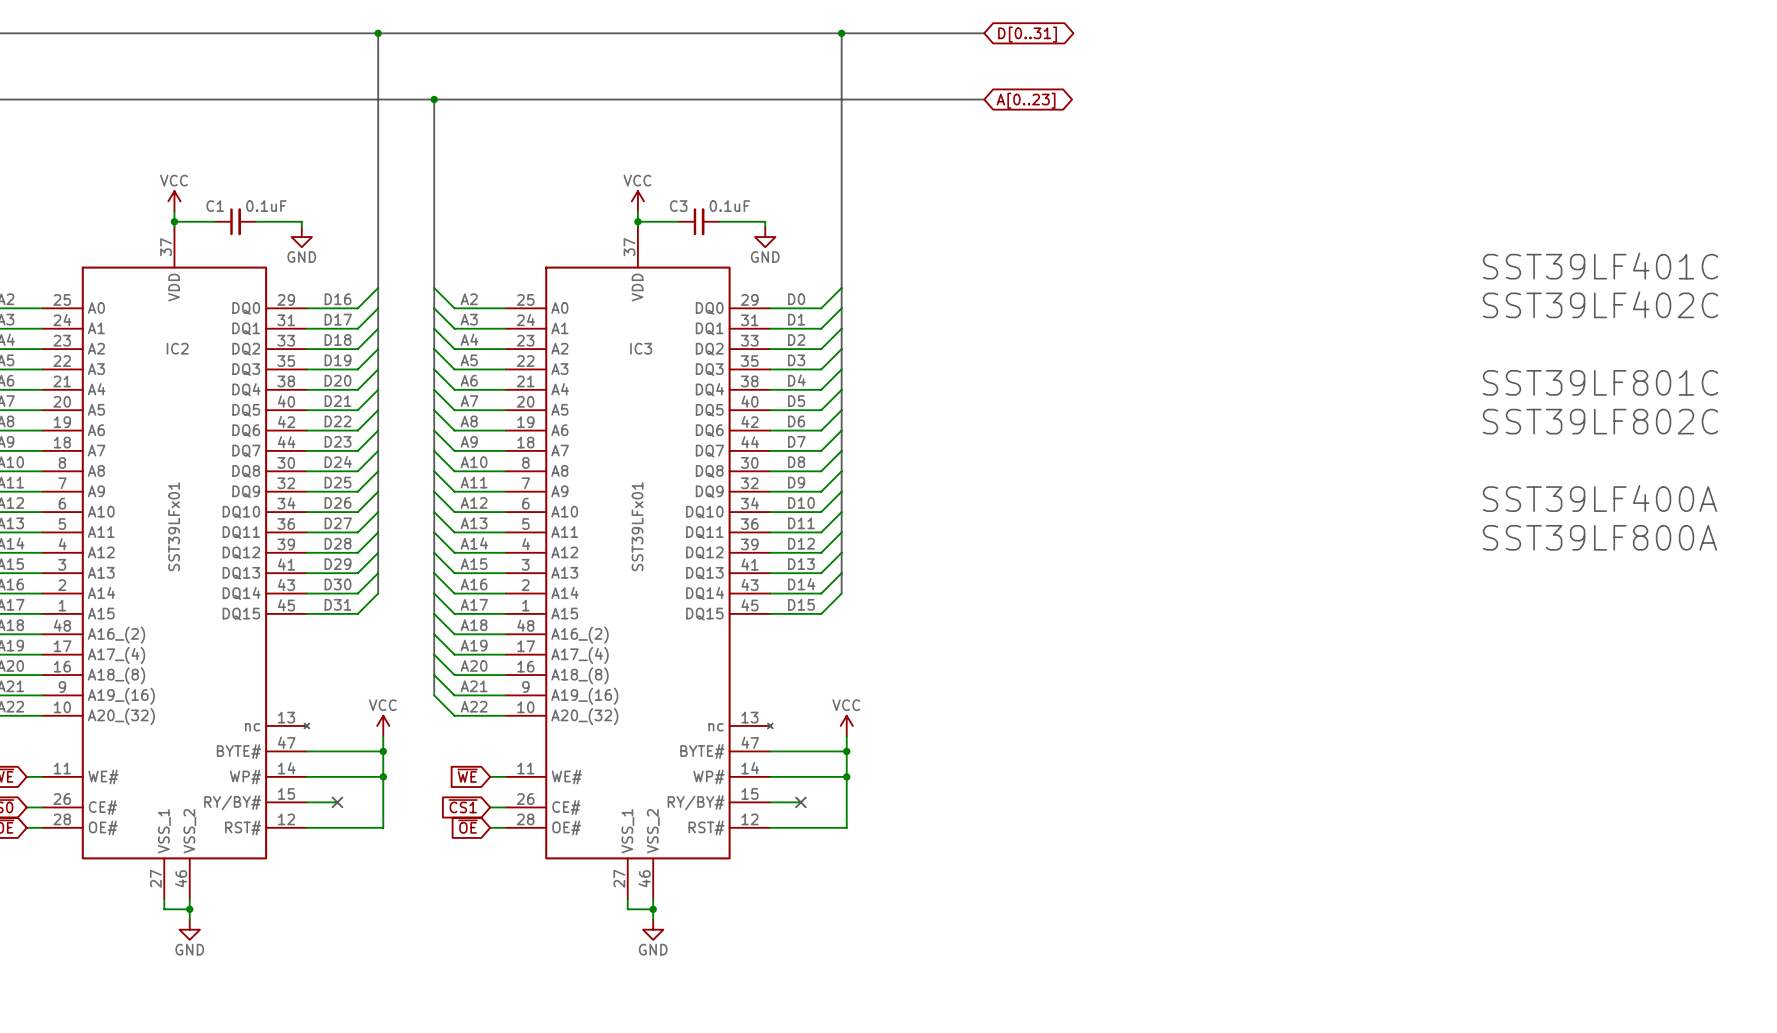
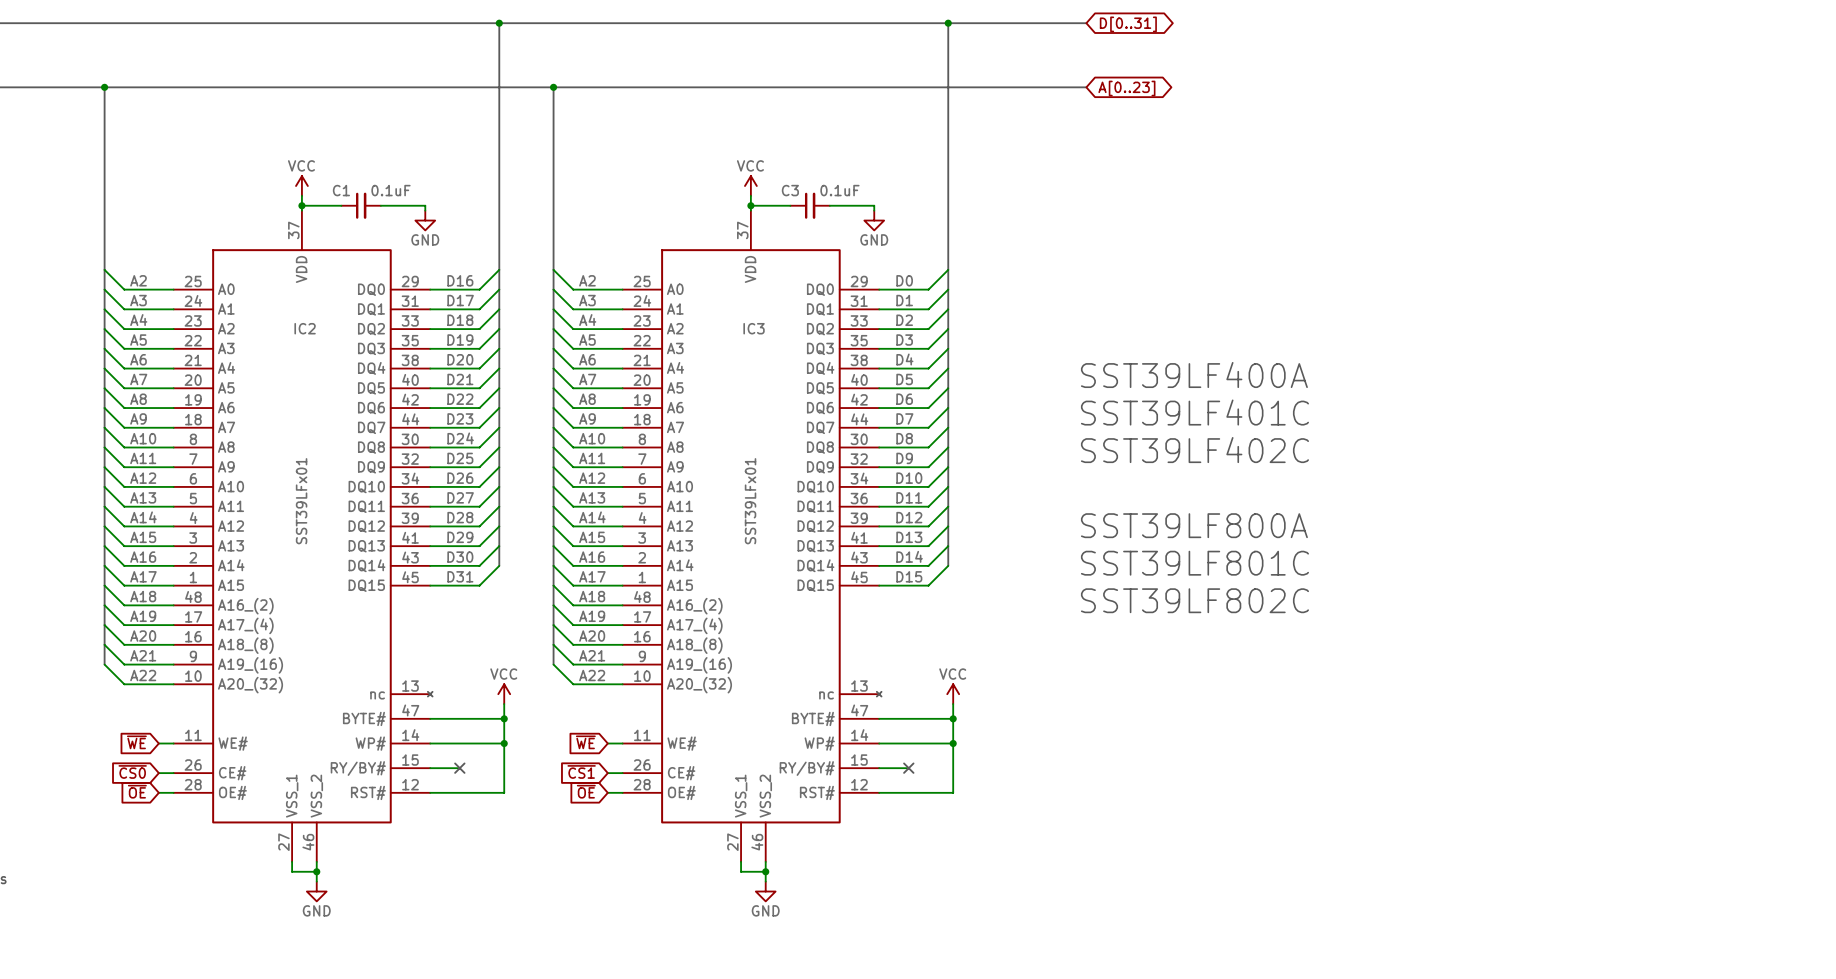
text: SST39LF401C (1600, 266) -> none
text: SST39LF402C (1600, 304) -> none
text: SST39LF801C (1600, 382) -> none
text: none -> SST39LF400A (1194, 375)
text: SST39LF802C (1600, 421) -> none
text: none -> SST39LF401C (1194, 412)
text: none -> SST39LF402C (1194, 450)
text: SST39LF400A (1599, 498) -> none
text: SST39LF800A (1599, 537) -> none
text: none -> SST39LF800A (1194, 525)
text: none -> SST39LF801C (1194, 563)
text: none -> SST39LF802C (1194, 600)

